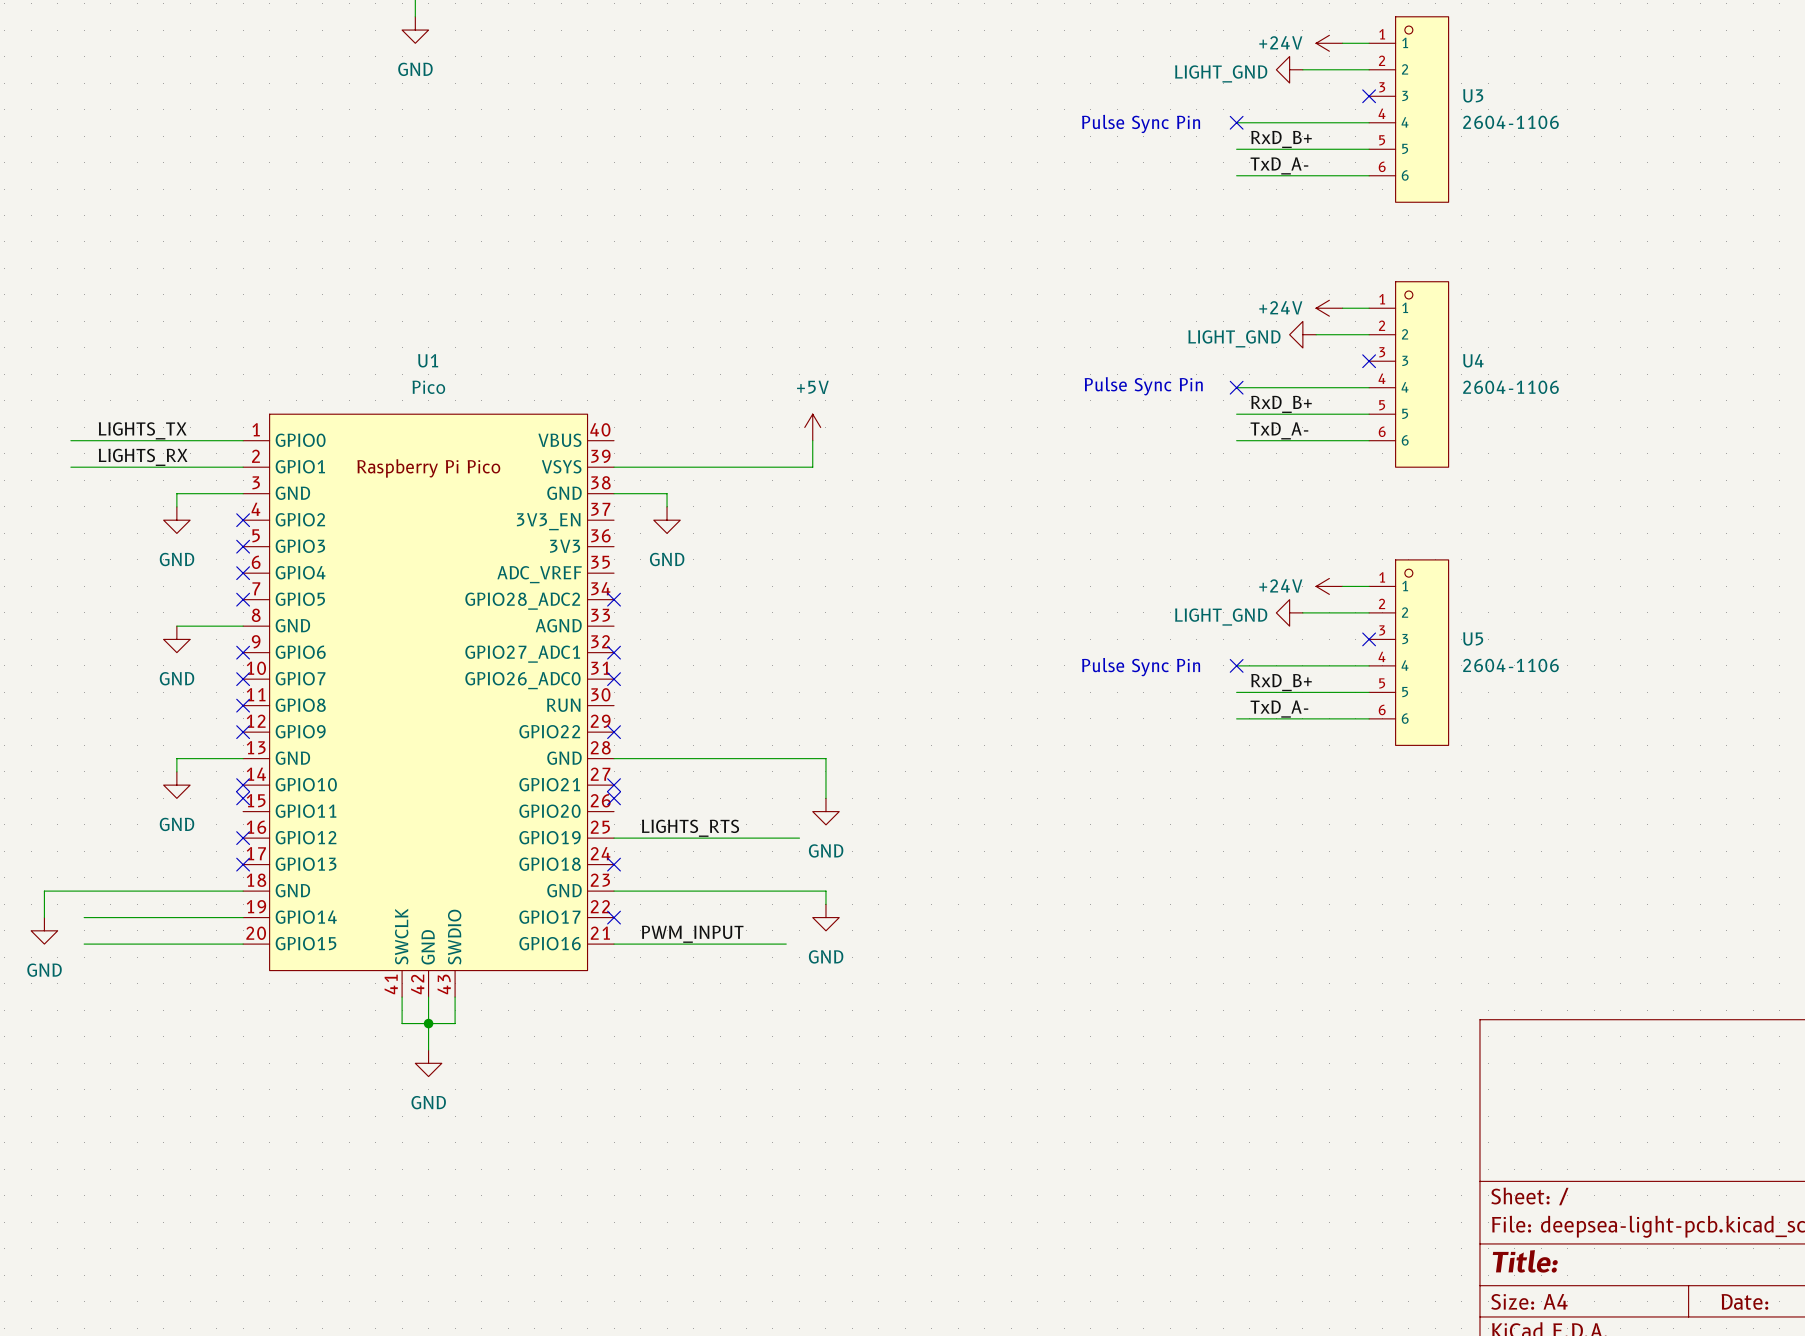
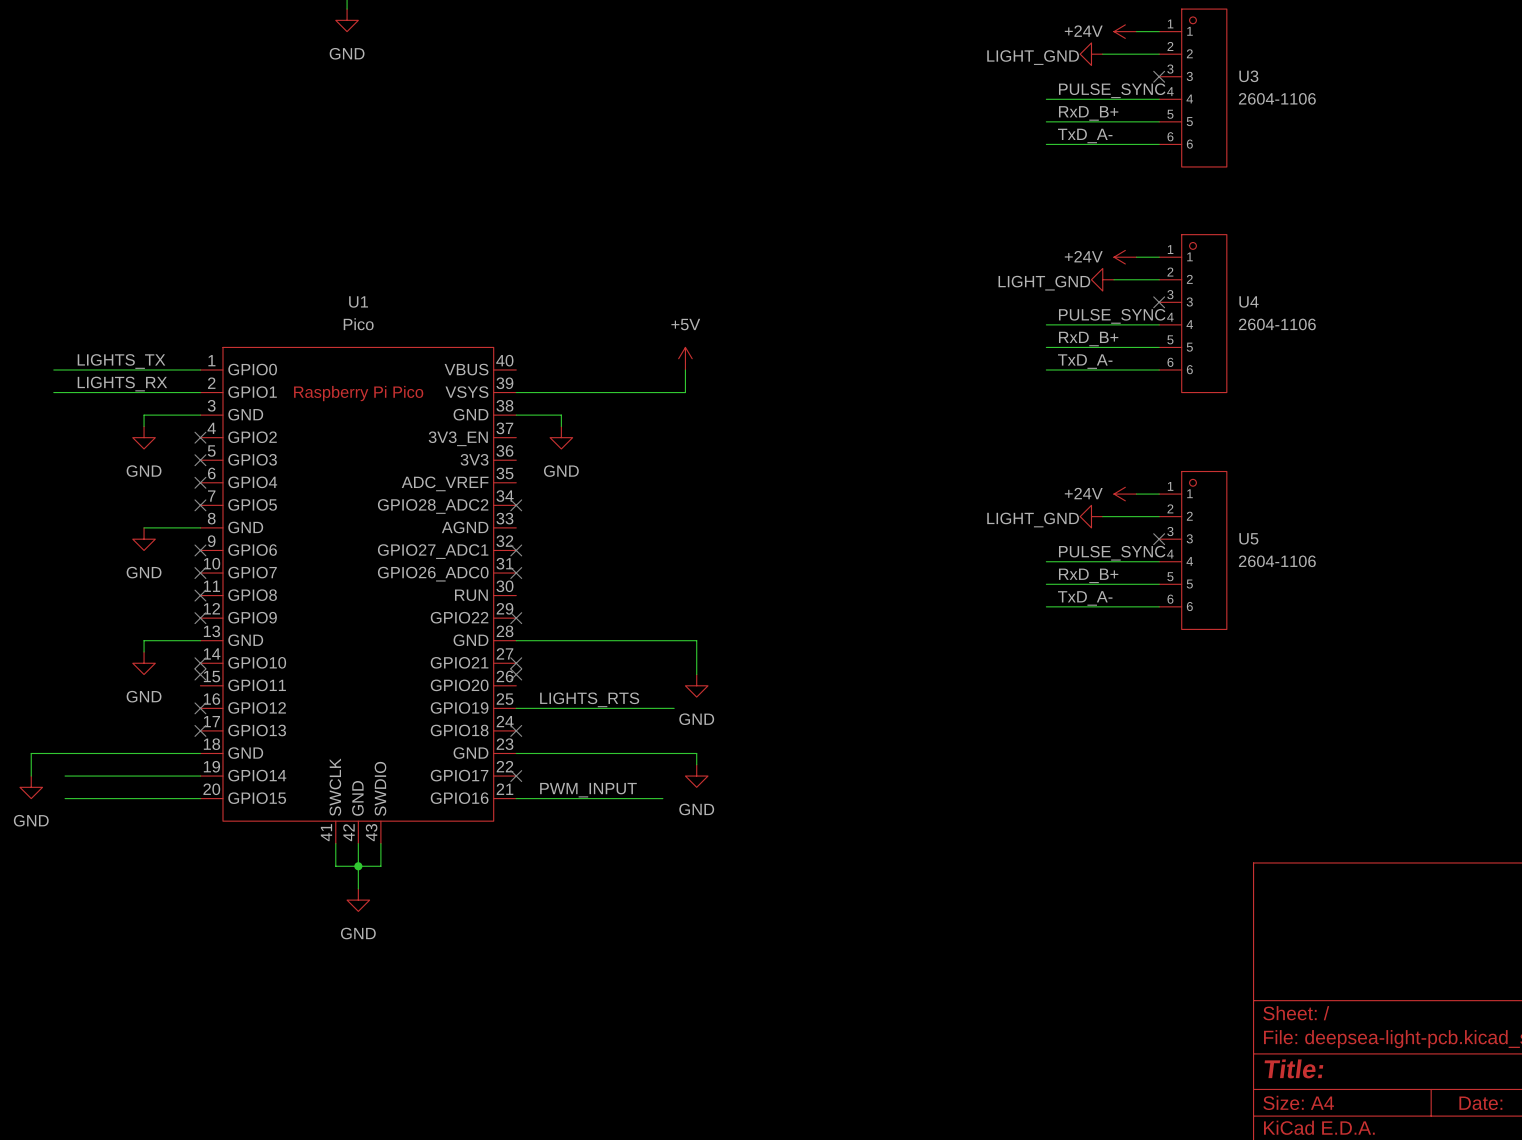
label: none -> PULSE_SYNC (1112, 90)
no-connect mark: (1236, 122) -> none
text: Pulse Sync Pin (1141, 123) -> none
label: none -> PULSE_SYNC (1112, 316)
text: Pulse Sync Pin (1143, 386) -> none
no-connect mark: (1236, 387) -> none
label: none -> PULSE_SYNC (1112, 553)
no-connect mark: (1236, 665) -> none
text: Pulse Sync Pin (1141, 667) -> none

